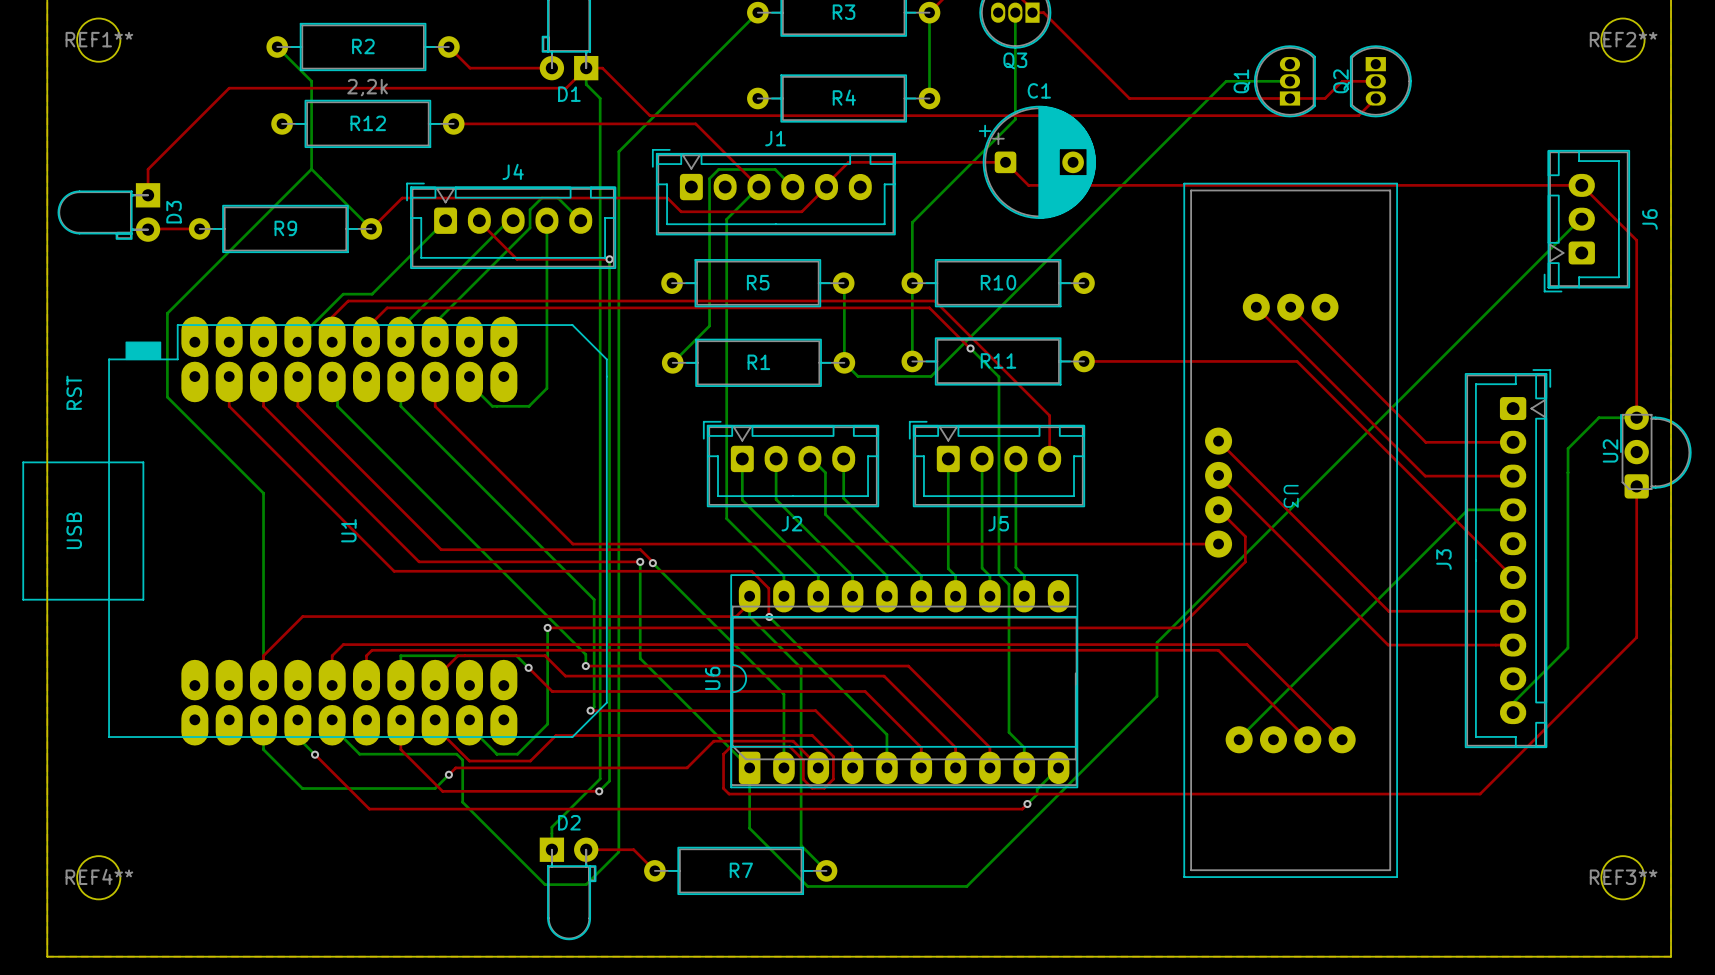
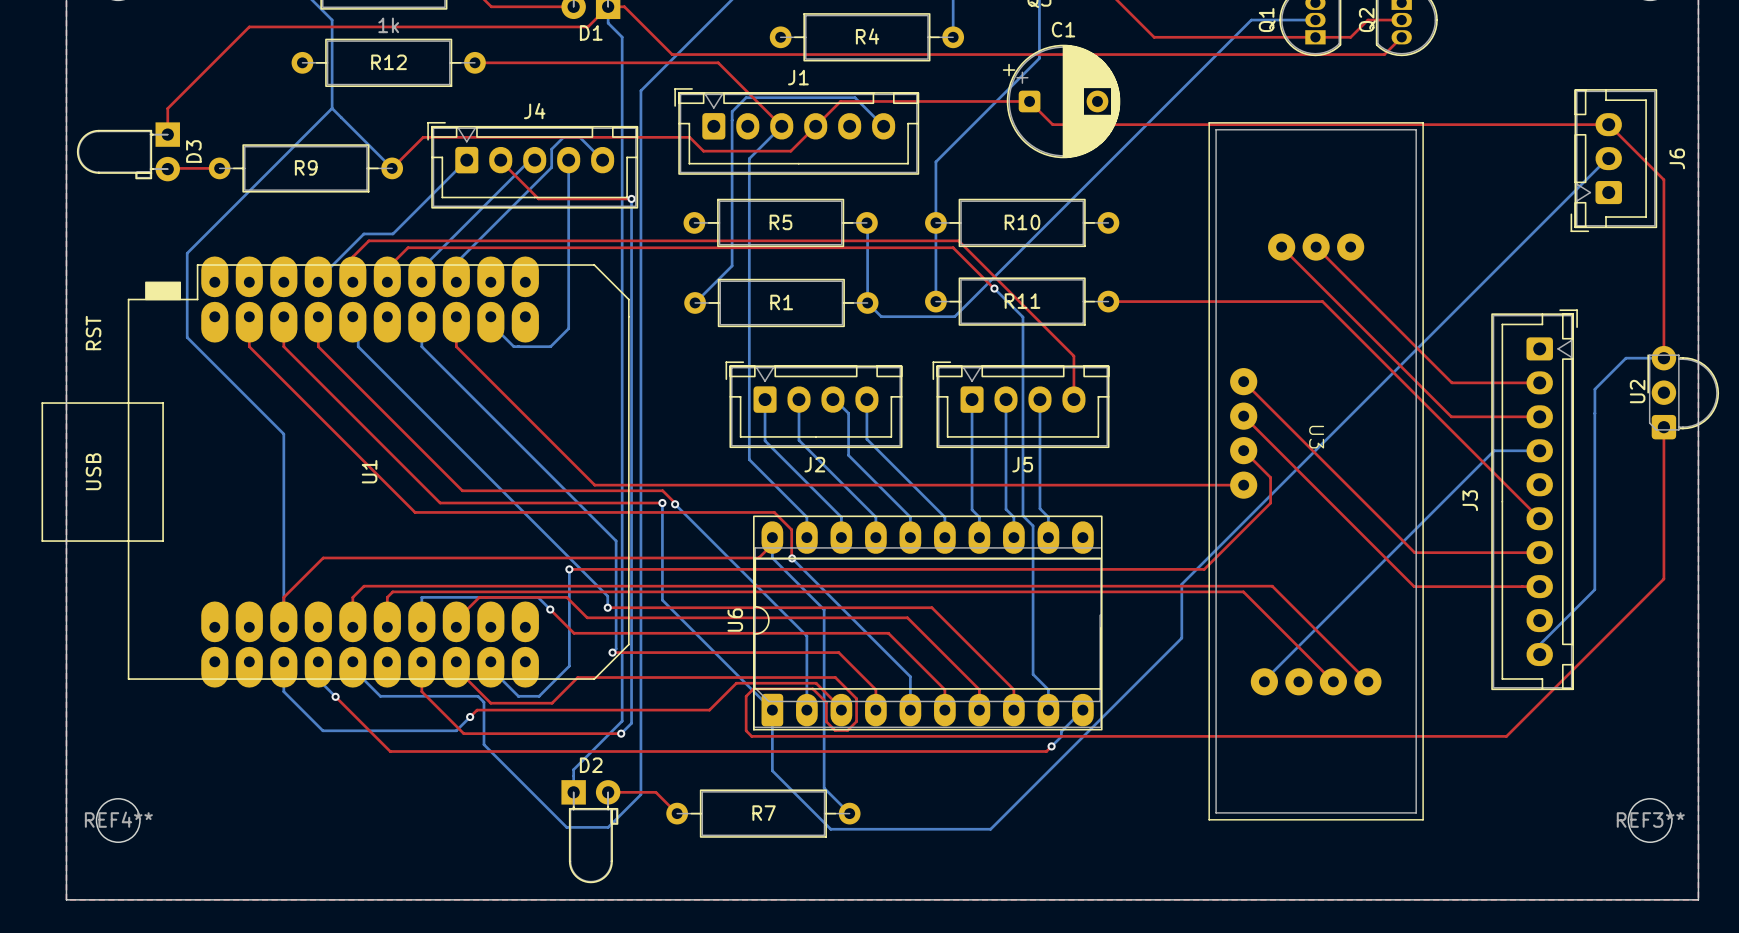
R12 value: 2,2k (367, 87) -> 1k (388, 25)
top track: (848, 162) (826, 184) -> none
bottom track: (709, 178) (718, 169) (775, 169) (792, 187) -> (732, 117) (732, 111) (746, 97) (854, 97) (883, 126)
top track: (826, 187) (801, 211) (768, 211) -> (871, 101) (840, 101) (790, 151)

